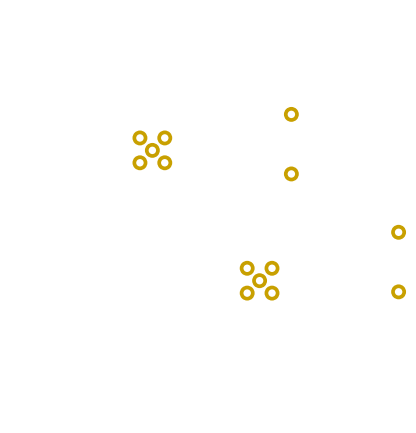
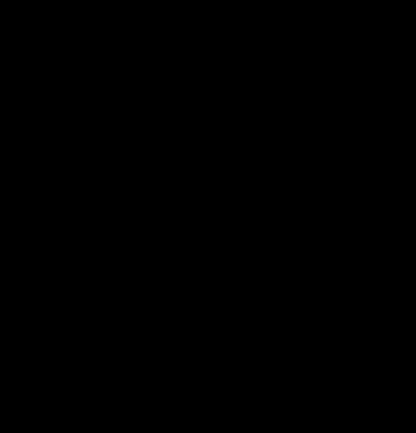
part: (291, 144) -> none
part: (152, 150) -> none
part: (398, 262) -> none
part: (259, 280) -> none

